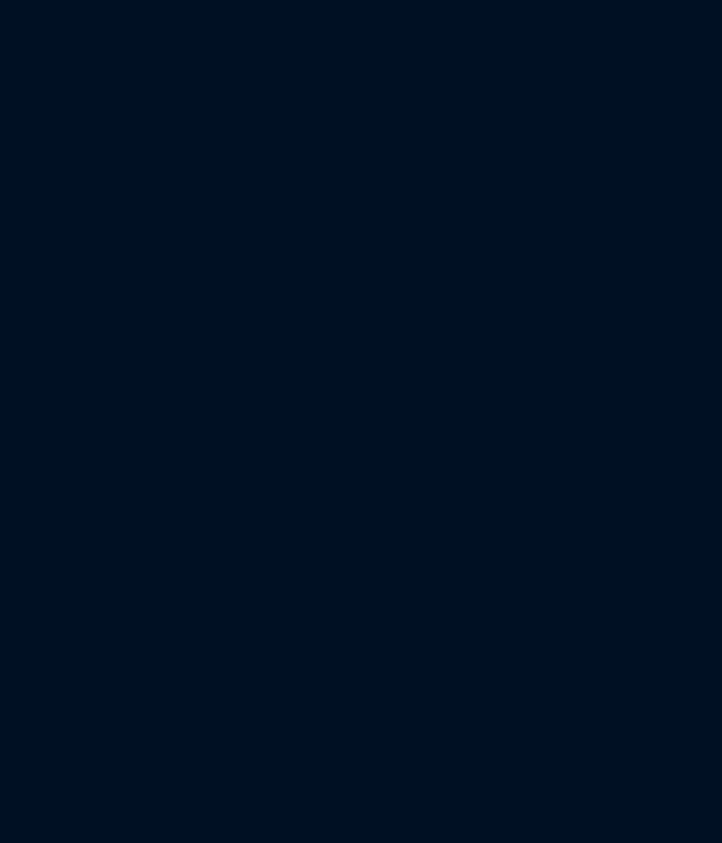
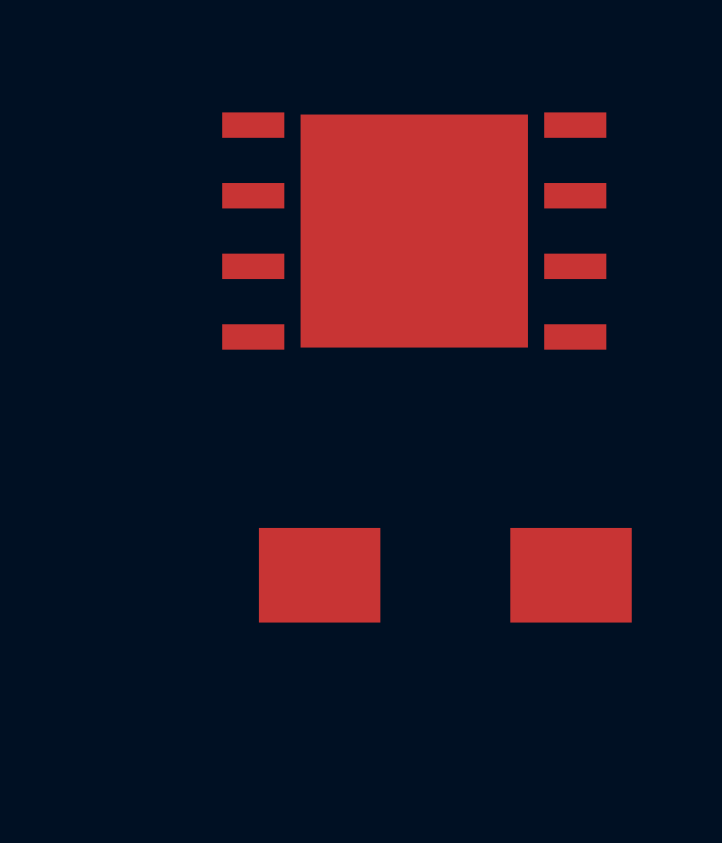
part: none -> (414, 231)
part: none -> (445, 575)

